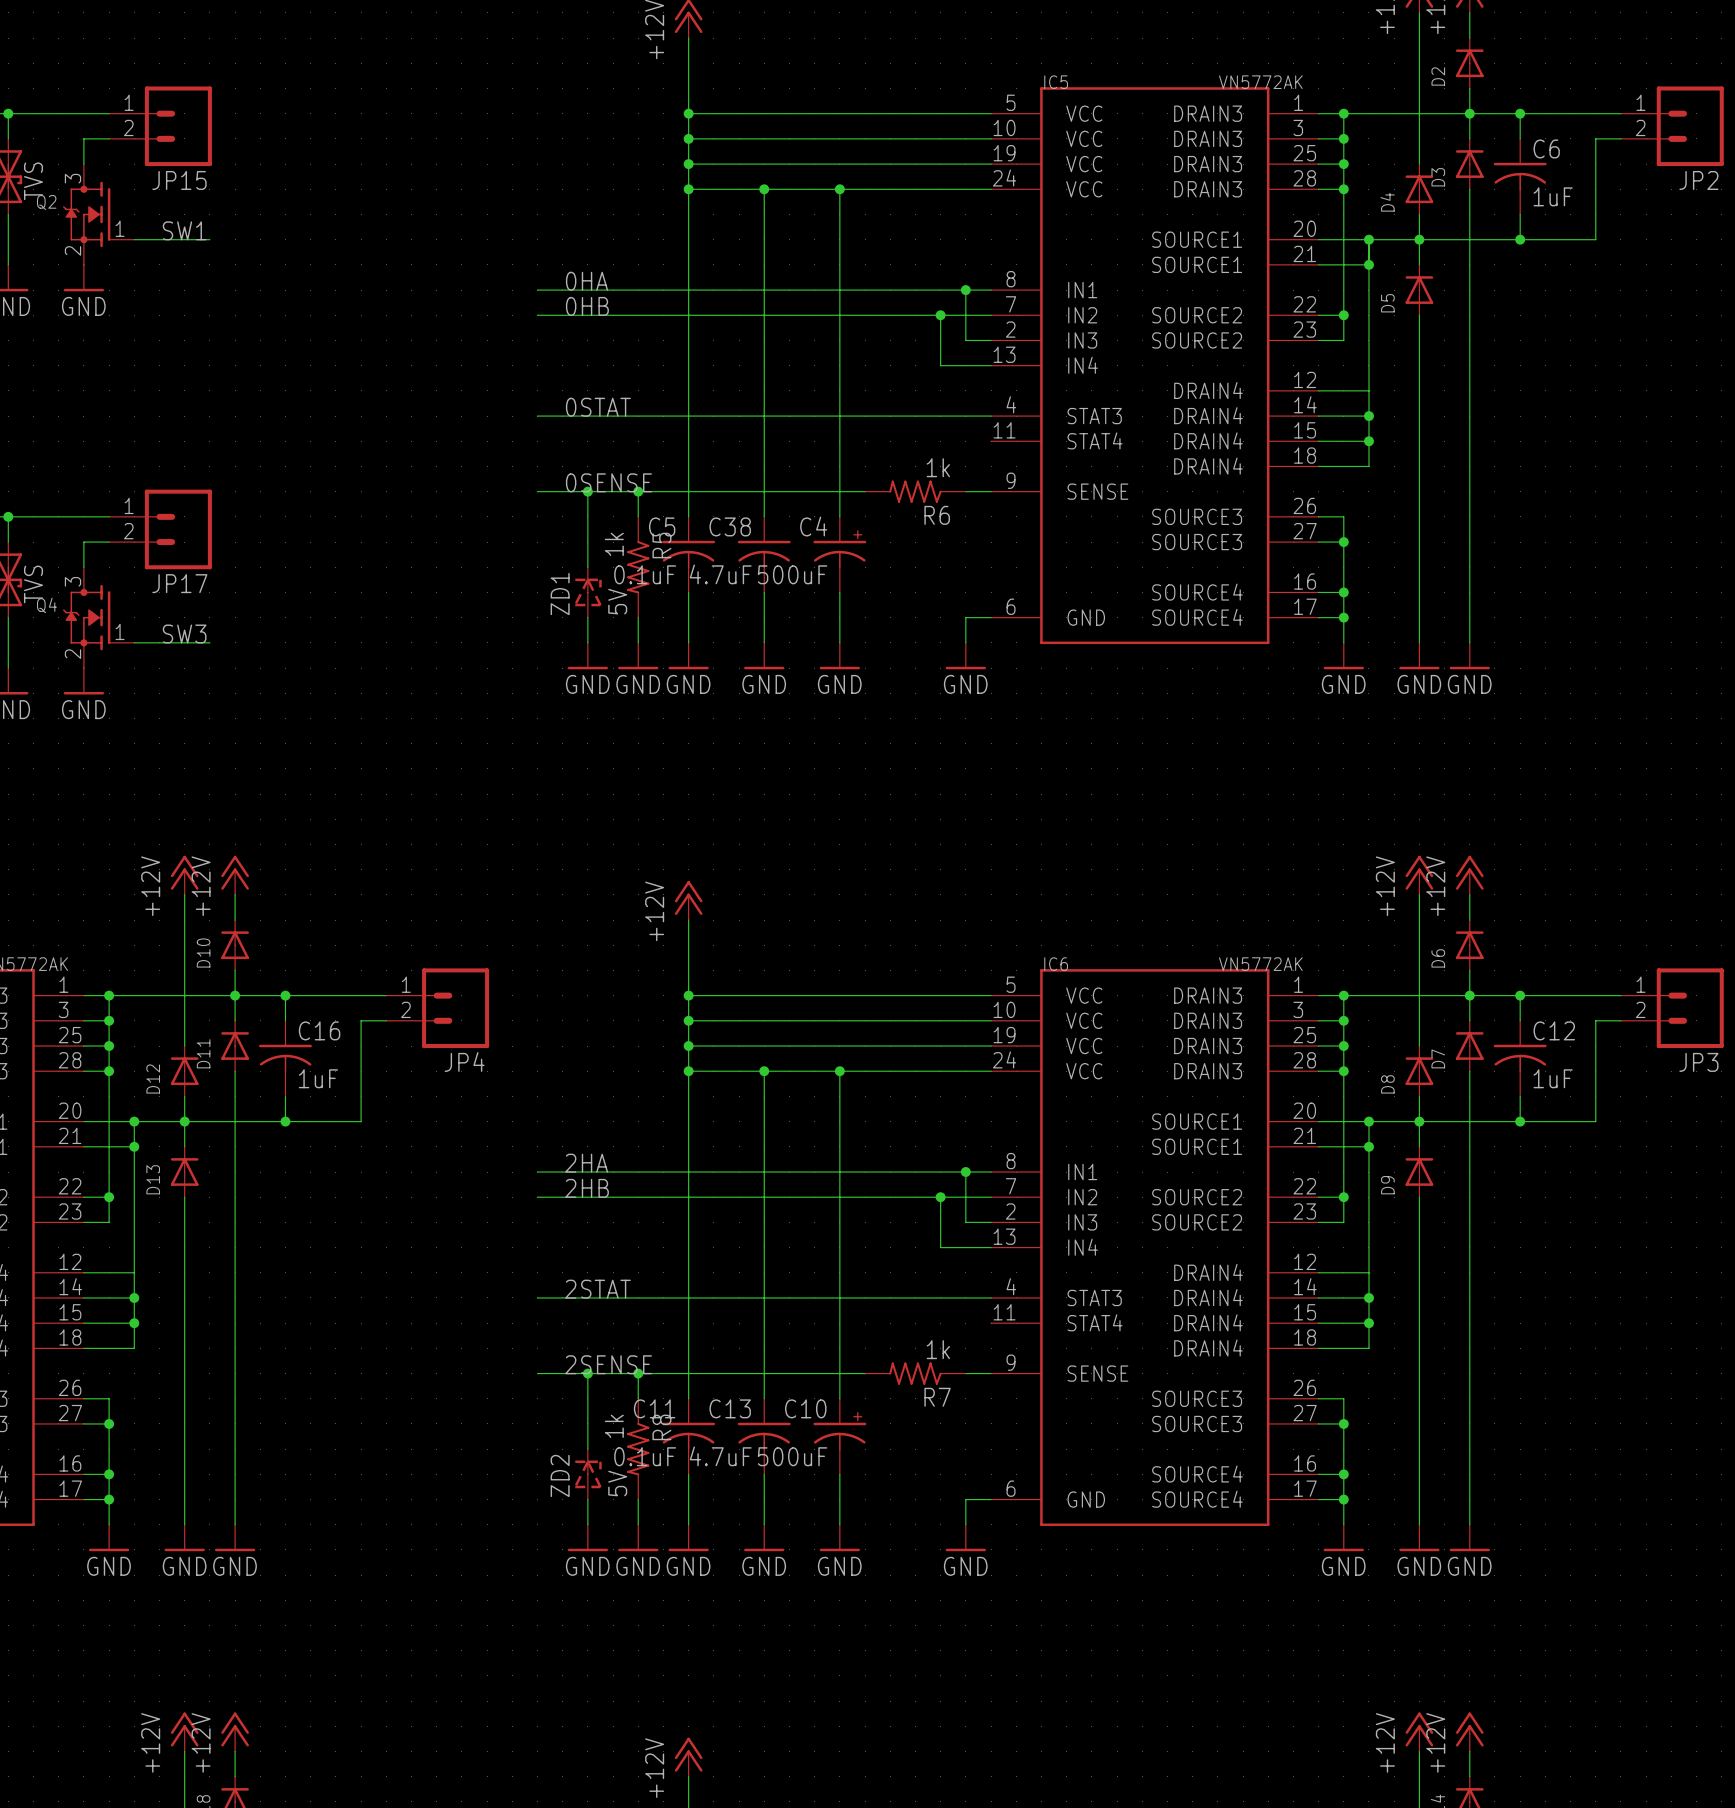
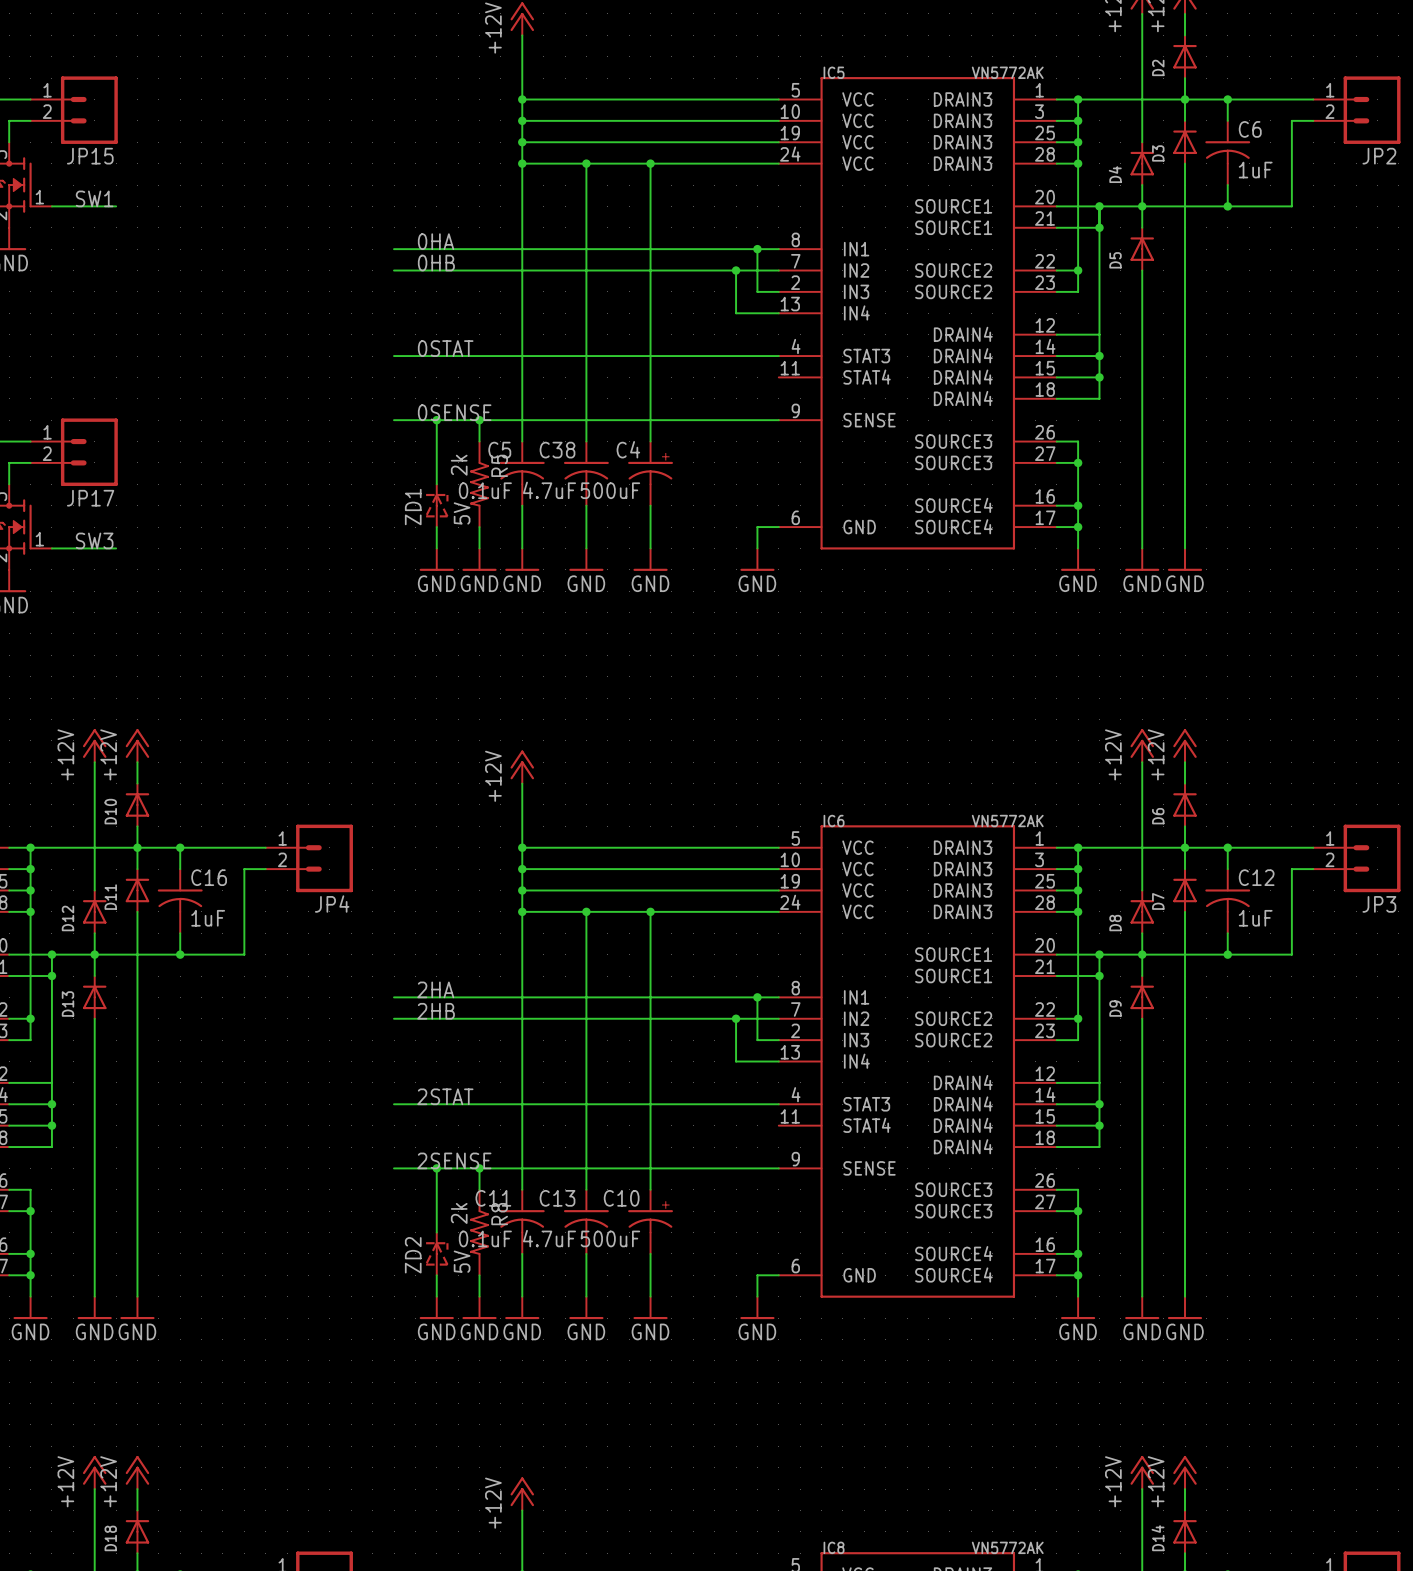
R6: 1k (915, 491) -> none
R5 value: 1k (614, 544) -> 2k (459, 465)
R7: 1k (915, 1373) -> none
R8 value: 1k (614, 1426) -> 2k (459, 1213)

